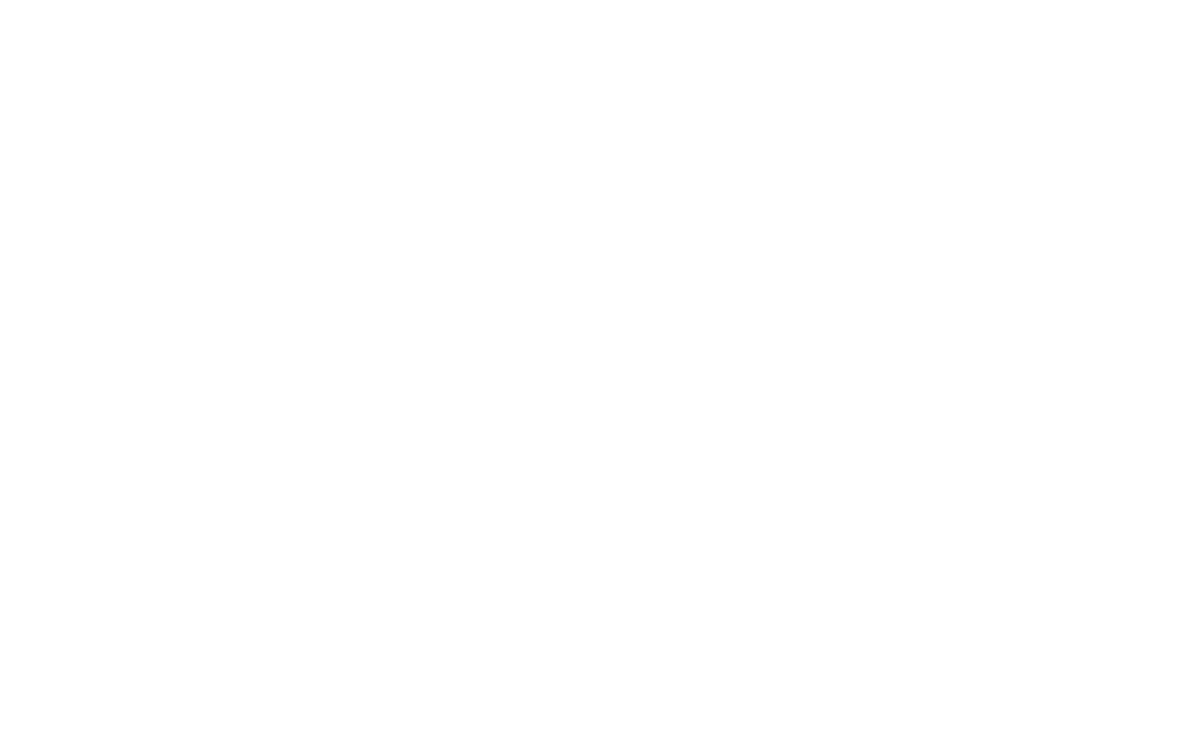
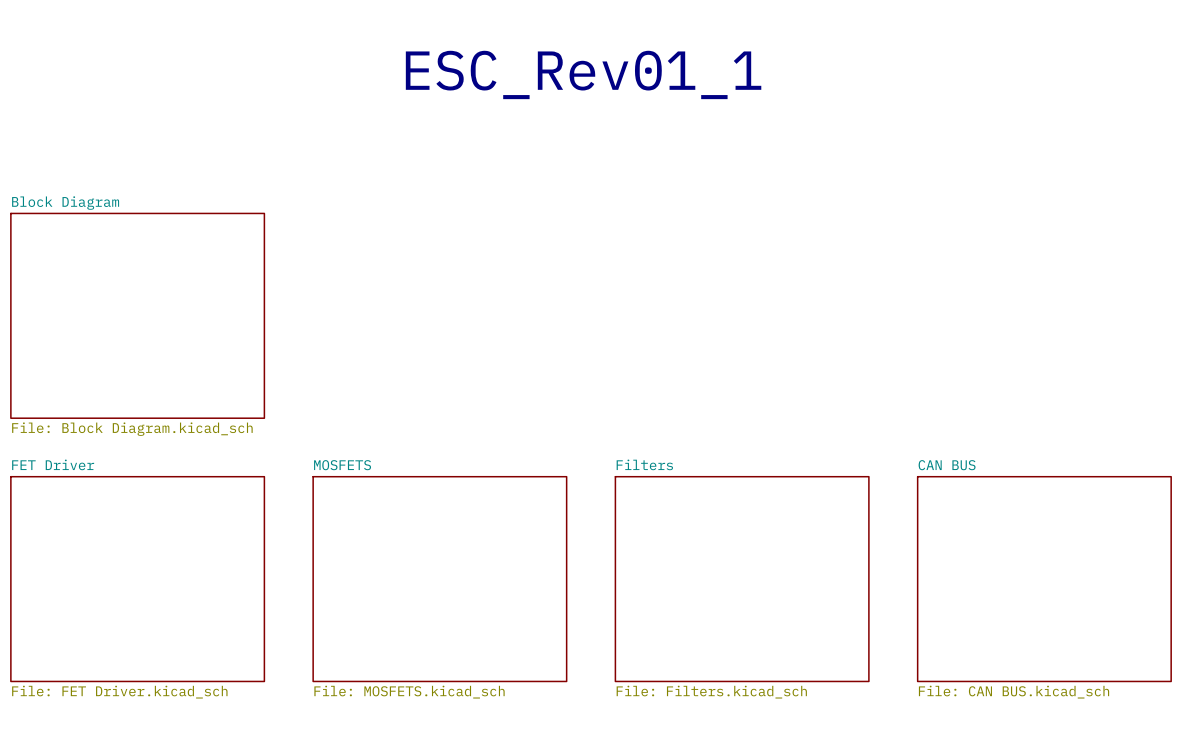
text: none -> ESC_Rev01_1 (583, 74)
sheet Block Diagram: none -> File: Block Diagram.kicad_sch (137, 315)
sheet FET Driver: none -> File: FET Driver.kicad_sch (137, 579)
sheet MOSFETS: none -> File: MOSFETS.kicad_sch (439, 579)
sheet Filters: none -> File: Filters.kicad_sch (742, 579)
sheet CAN BUS: none -> File: CAN BUS.kicad_sch (1044, 579)

